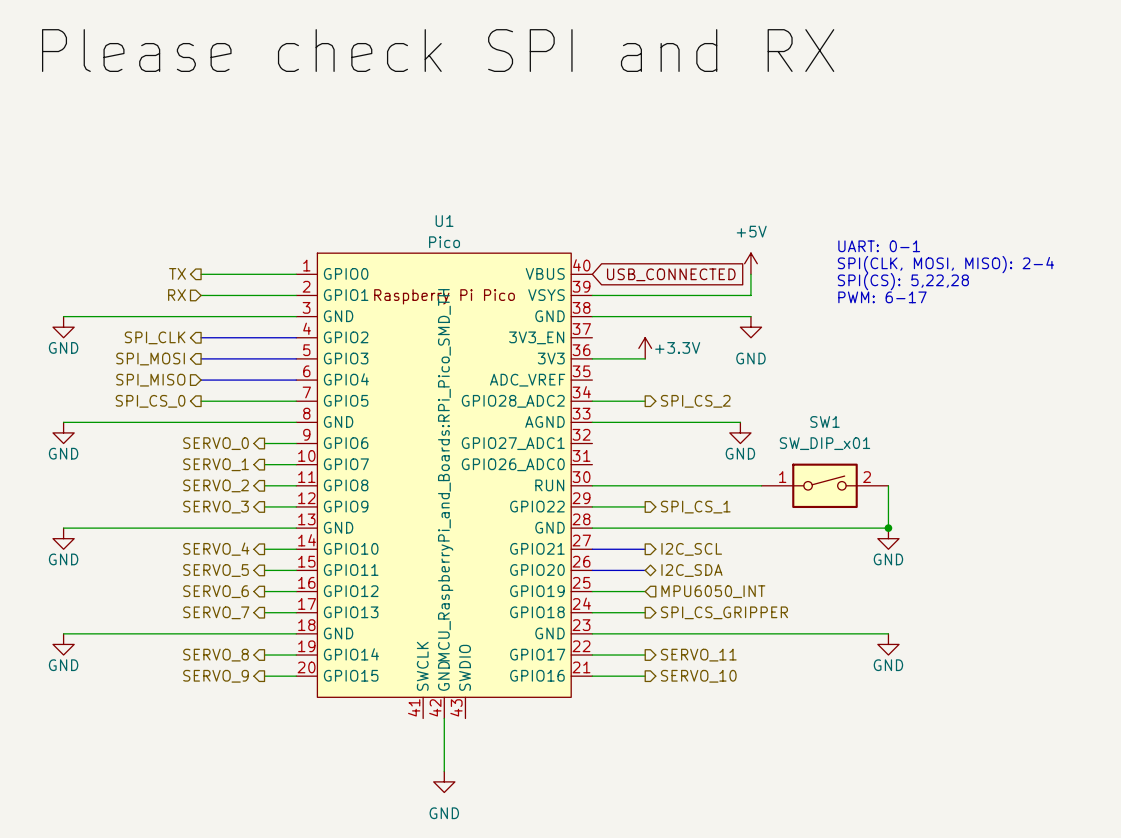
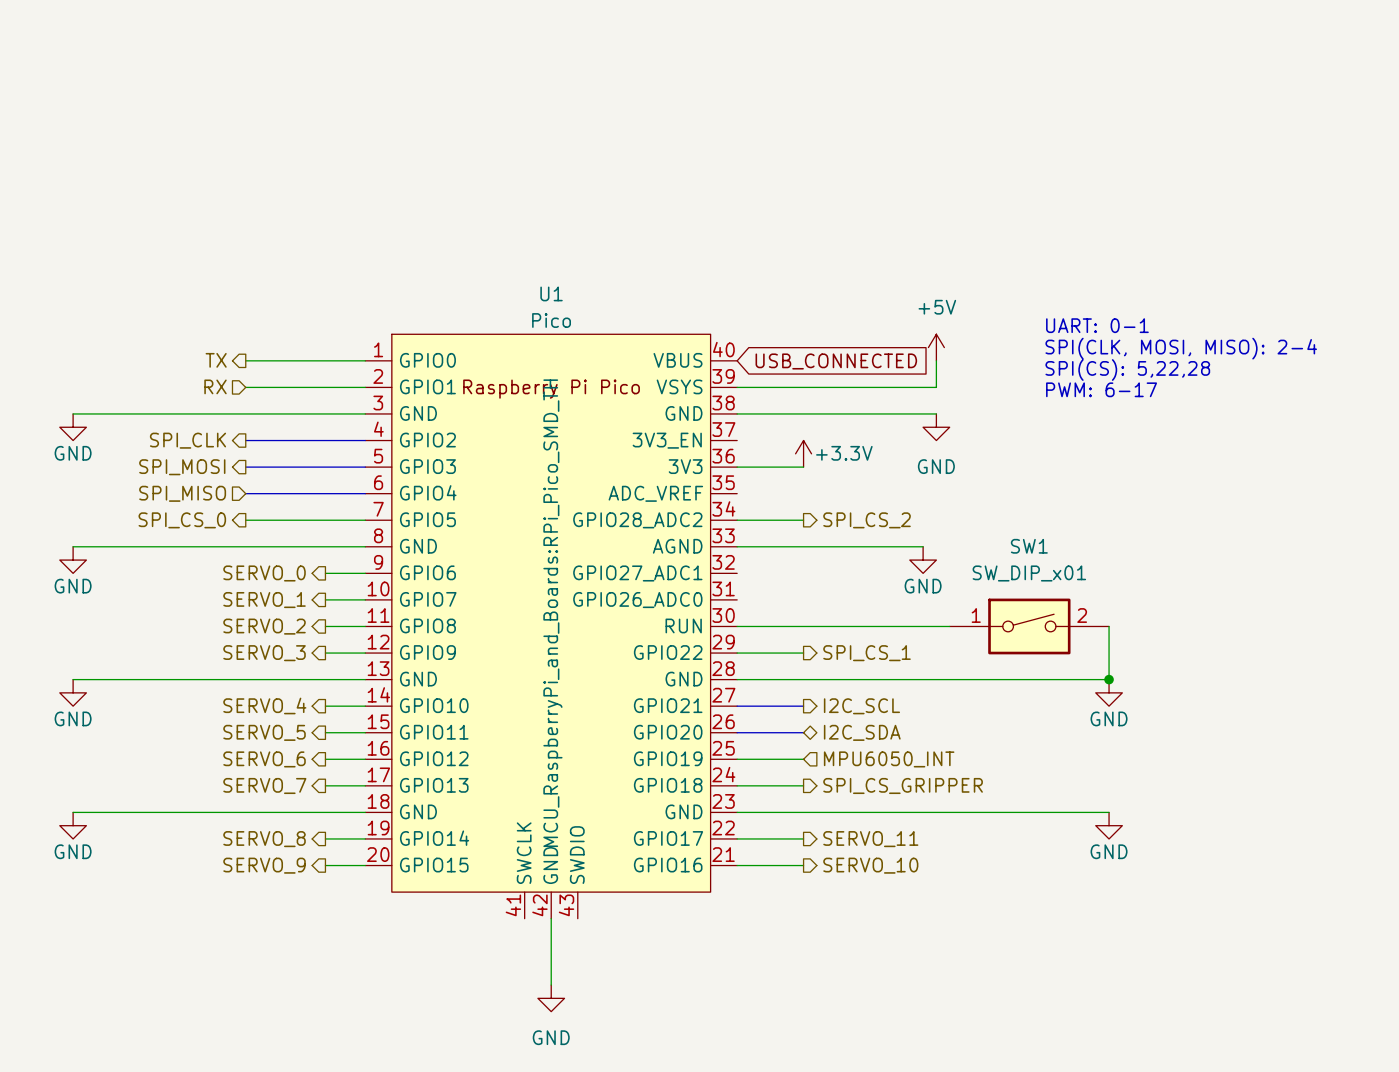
label: Please check SPI and RX (438, 50) -> none

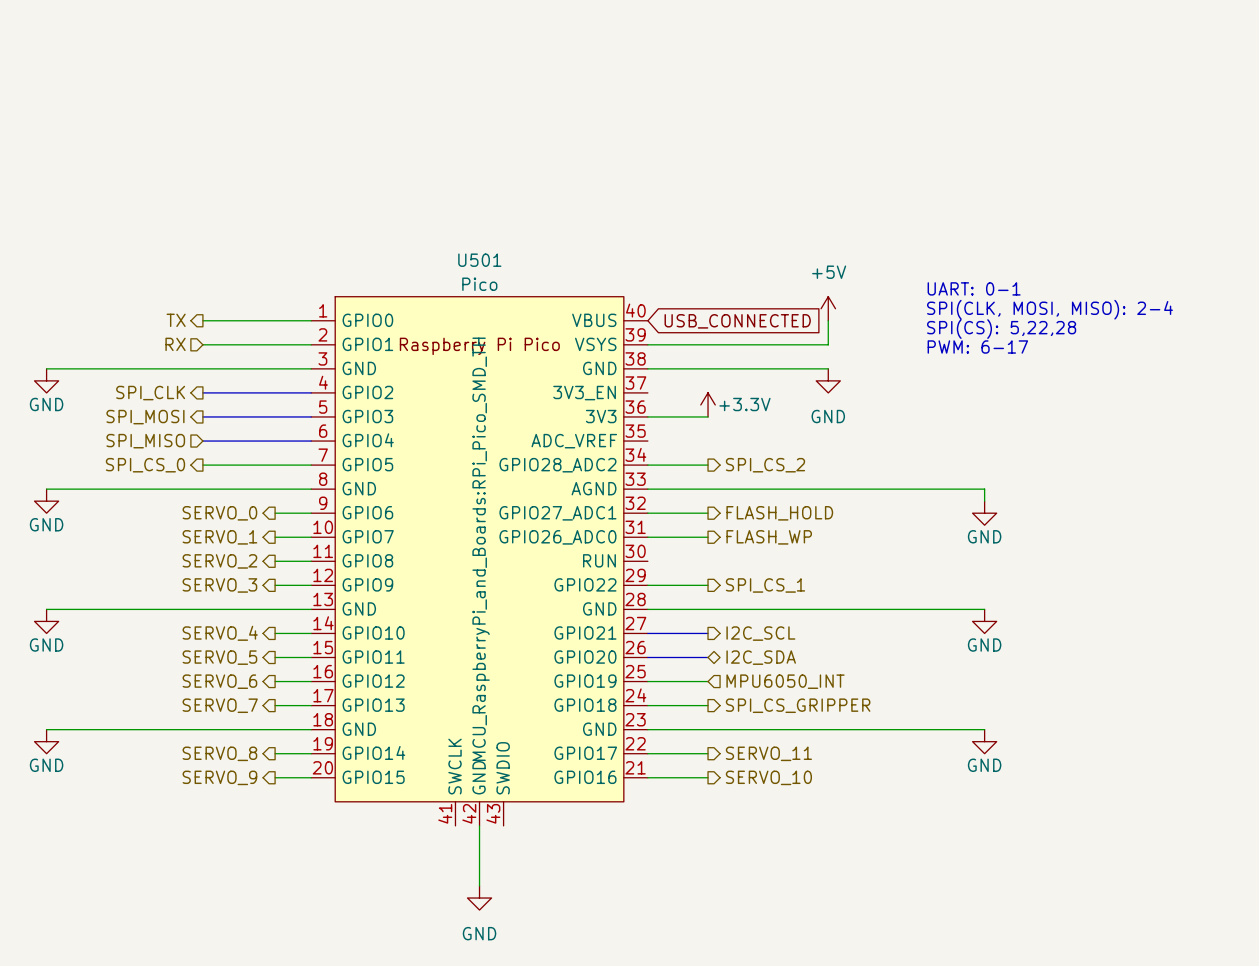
U1 name: U1 (551, 293) -> U501 (479, 260)
wire: none -> (816, 489) (984, 489) (984, 501)
power symbol position: GND (923, 560) -> GND (984, 513)
wire: none -> (647, 513) (708, 513)
hierarchical label: none -> FLASH_HOLD (779, 513)
wire: none -> (647, 537) (708, 537)
hierarchical label: none -> FLASH_WP (769, 537)
wire: (737, 626) (949, 626) -> none
SW1: SW_DIP_x01 (1029, 626) -> none
wire: (1109, 626) (1109, 679) -> none
junction: (1109, 679) -> none

